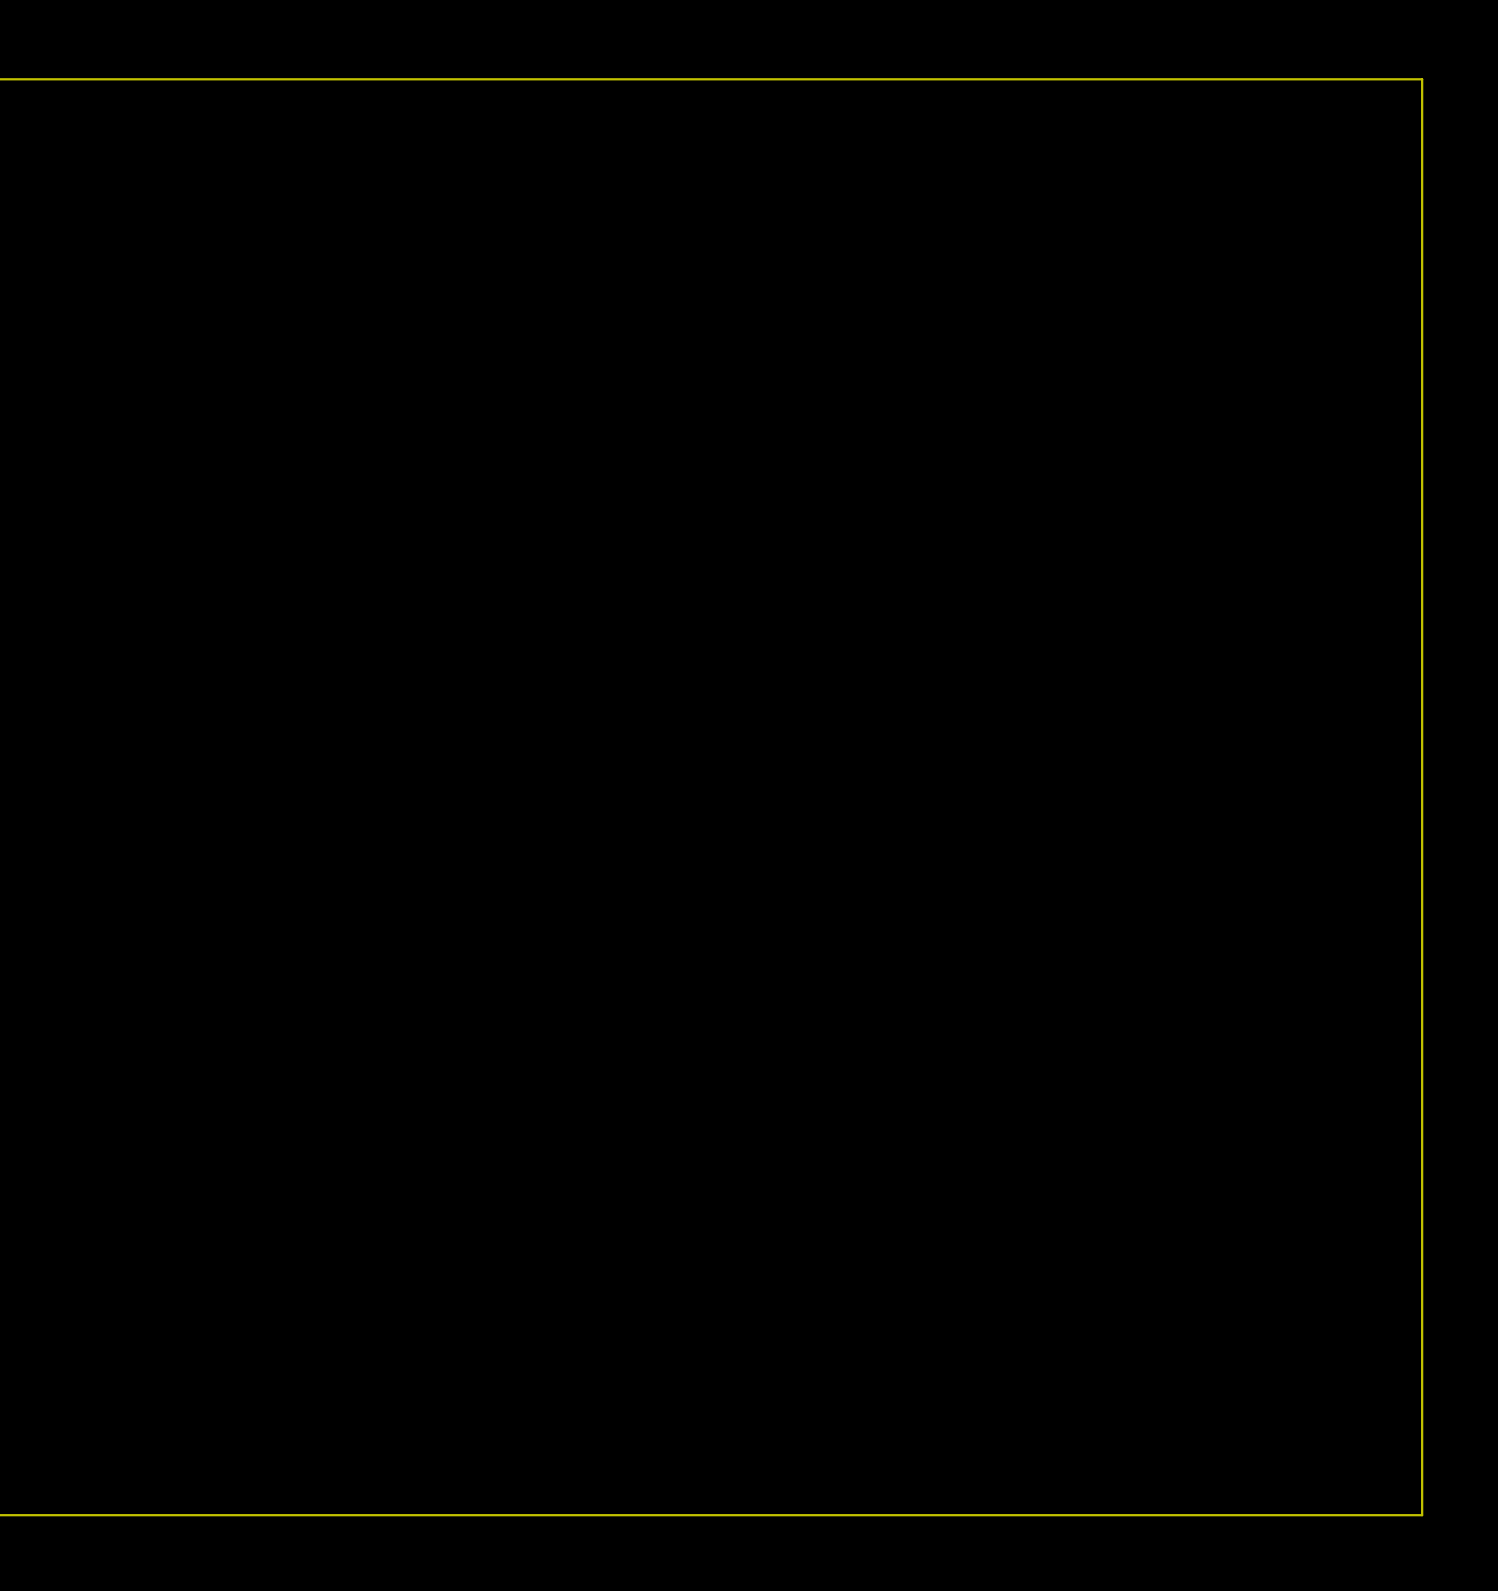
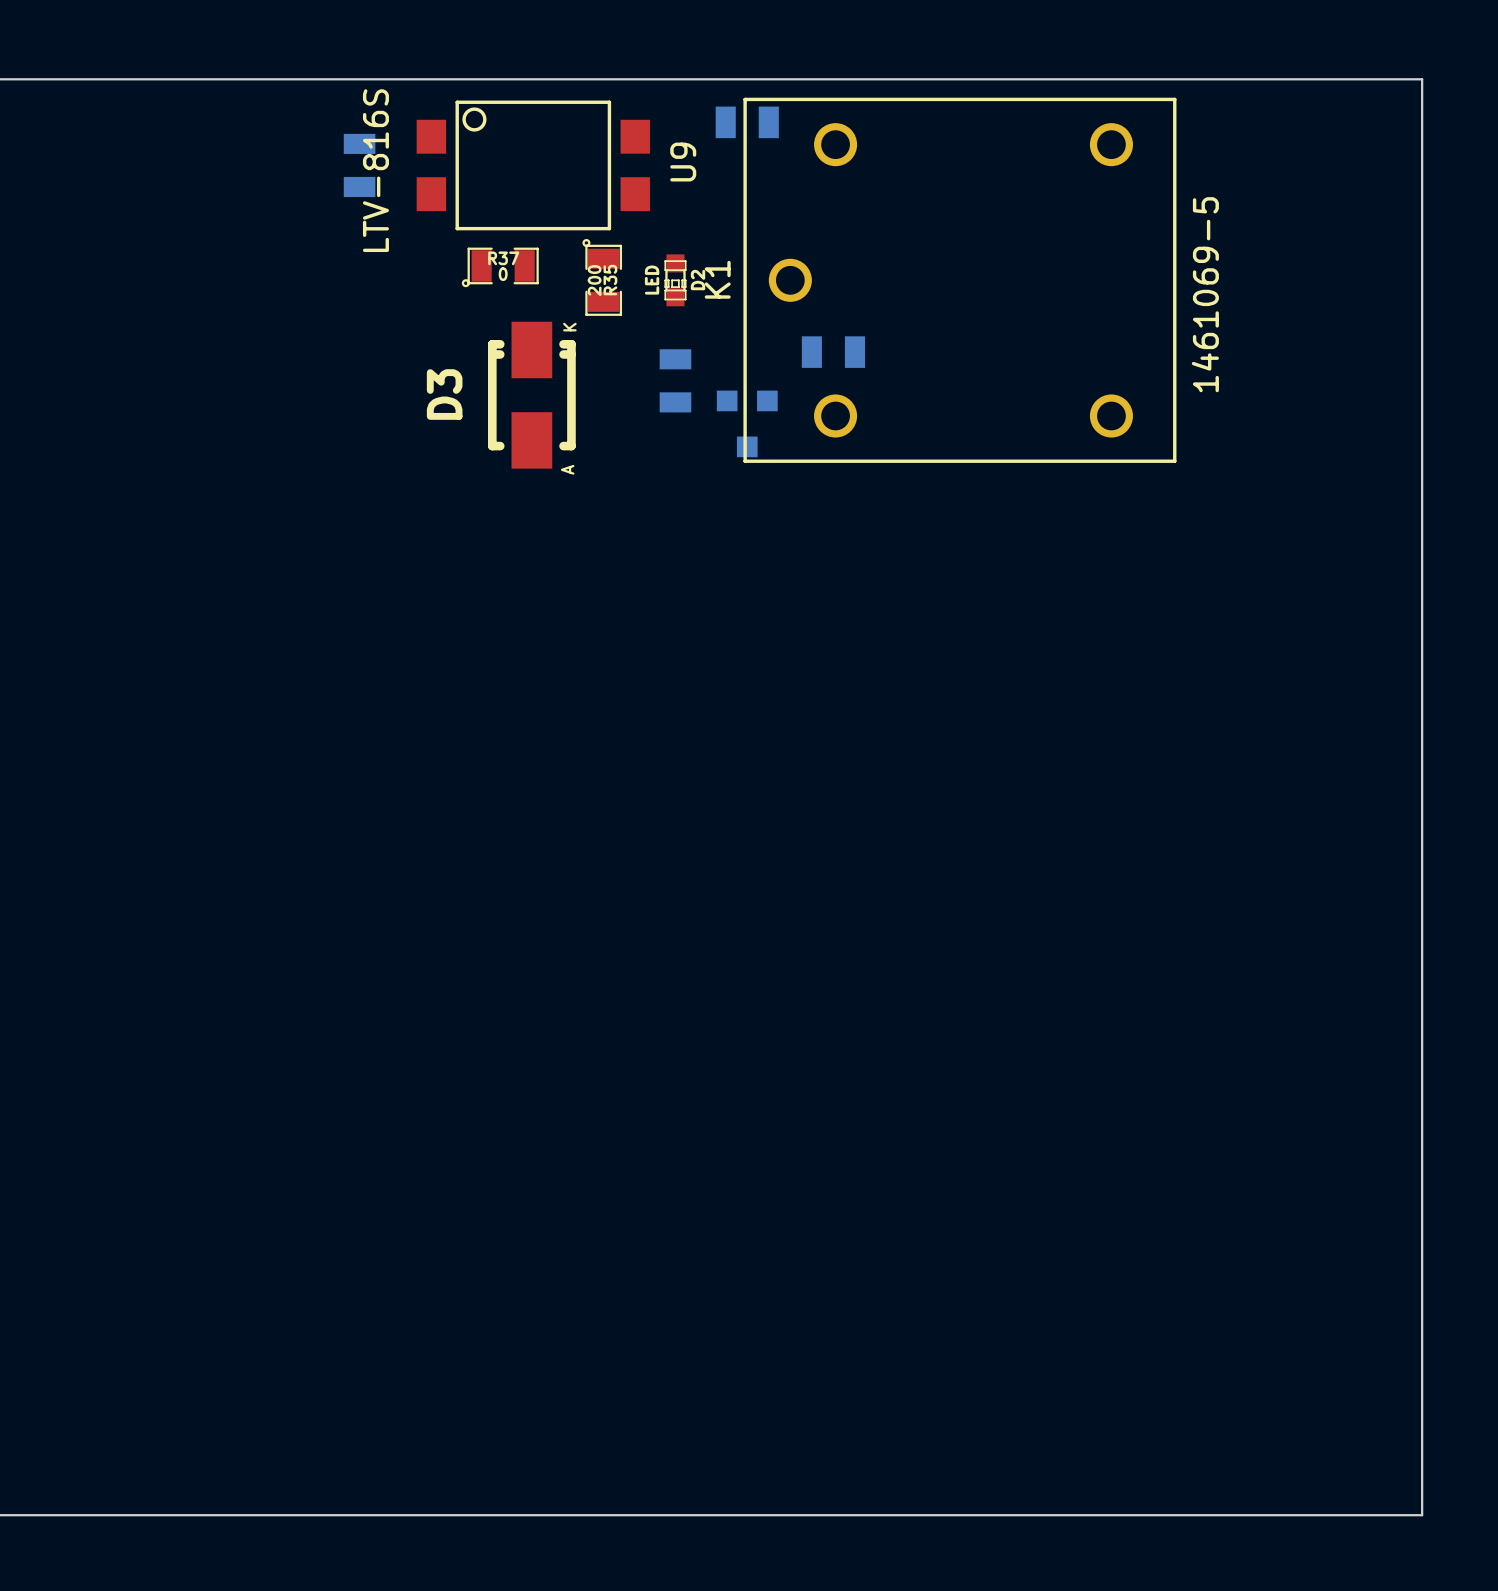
part: none -> (747, 122)
part: none -> (359, 165)
U9: none -> LTV-816S (533, 165)
R37: none -> 0 (500, 267)
R35: none -> 200 (602, 277)
D2: none -> LED (675, 280)
K1: none -> 1461069-5 (959, 280)
part: none -> (833, 352)
part: none -> (675, 380)
D3: none -> (531, 395)
part: none -> (747, 423)

